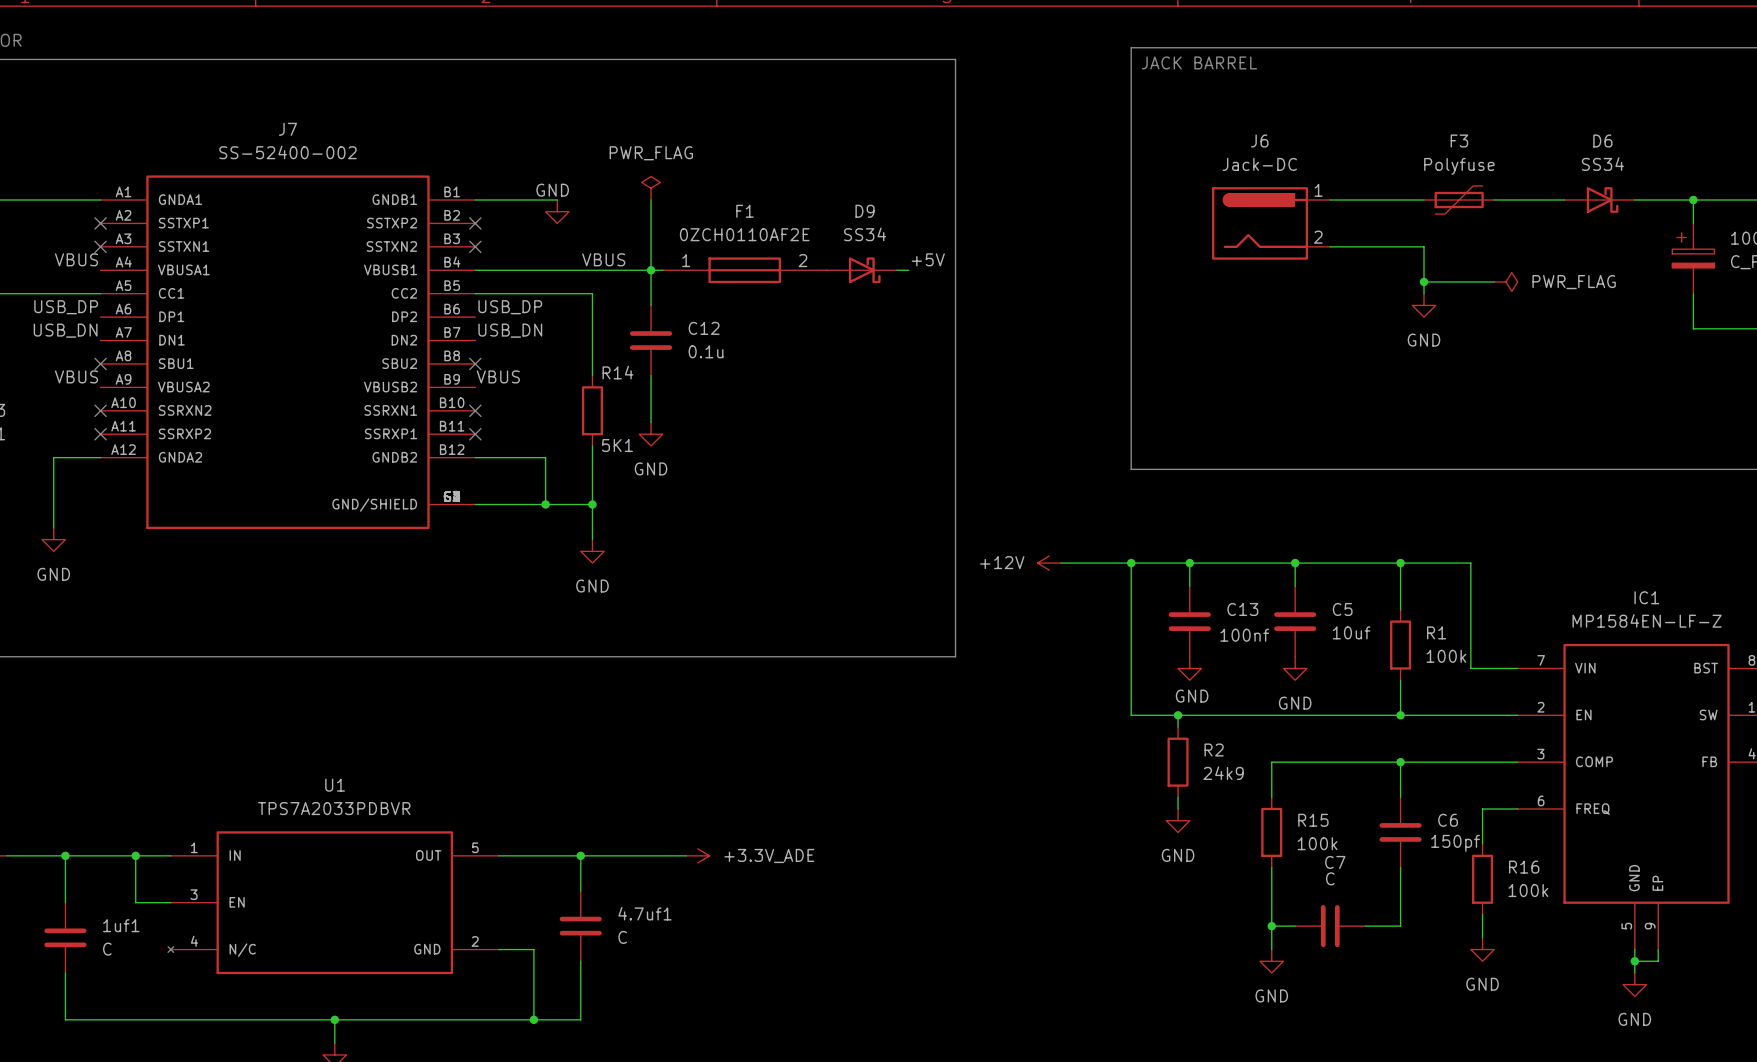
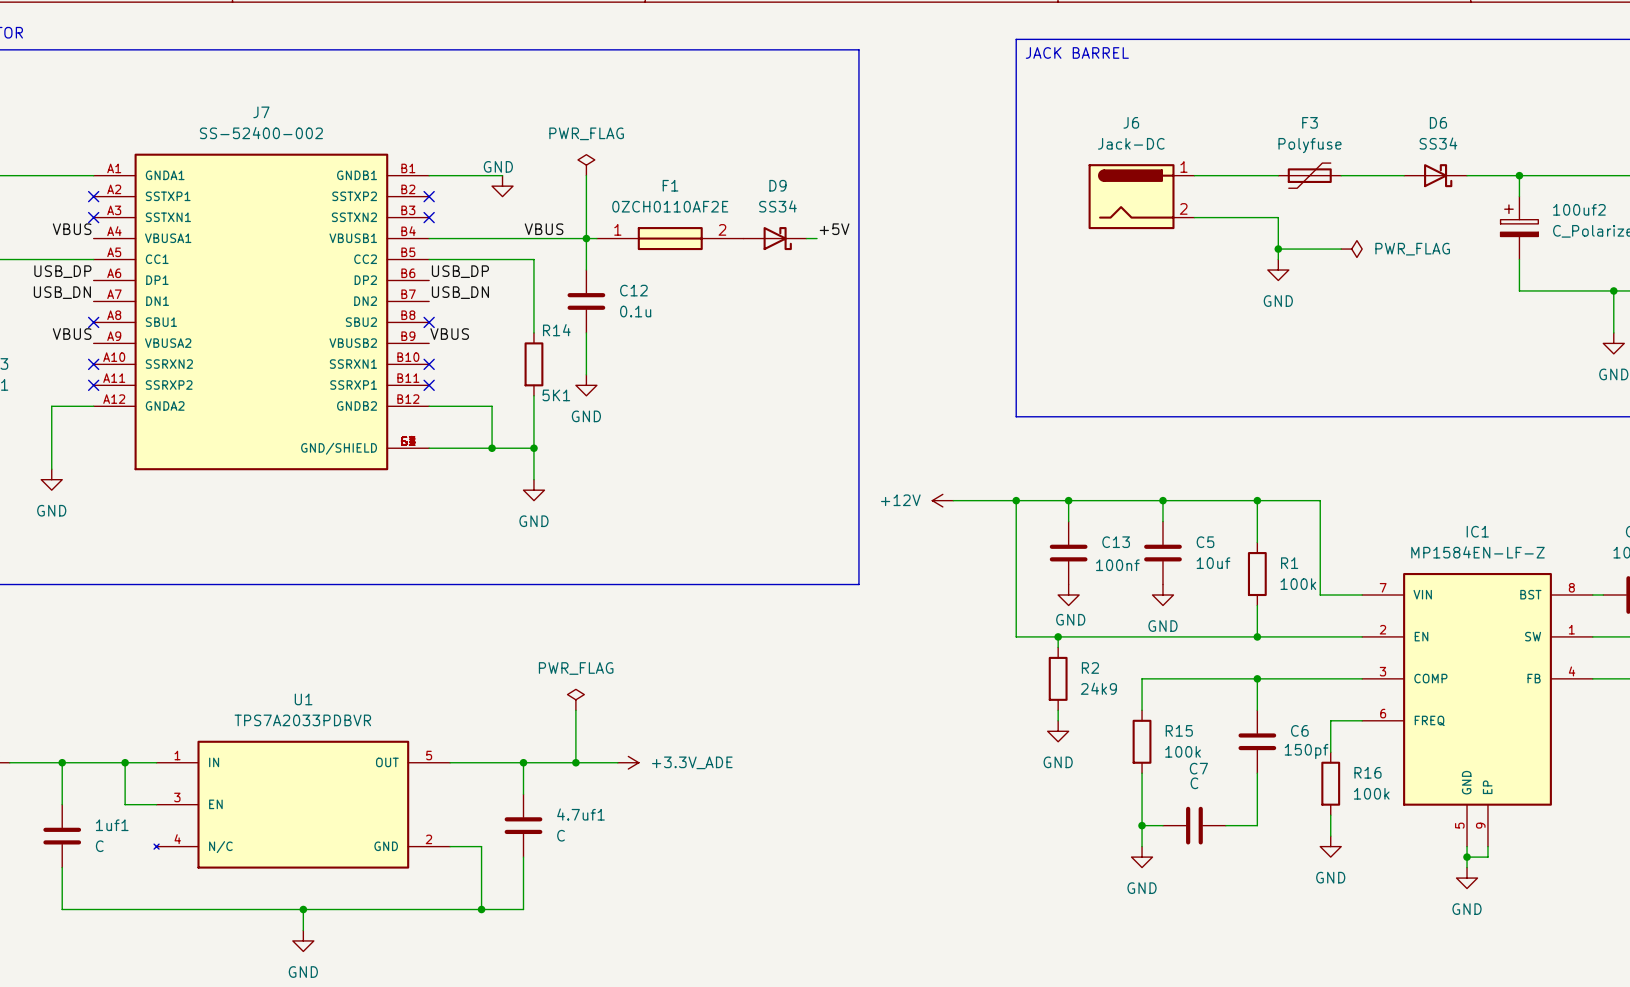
power symbol: none -> PWR_FLAG (575, 699)
wire: none -> (575, 710) (575, 762)
junction: none -> (575, 762)

